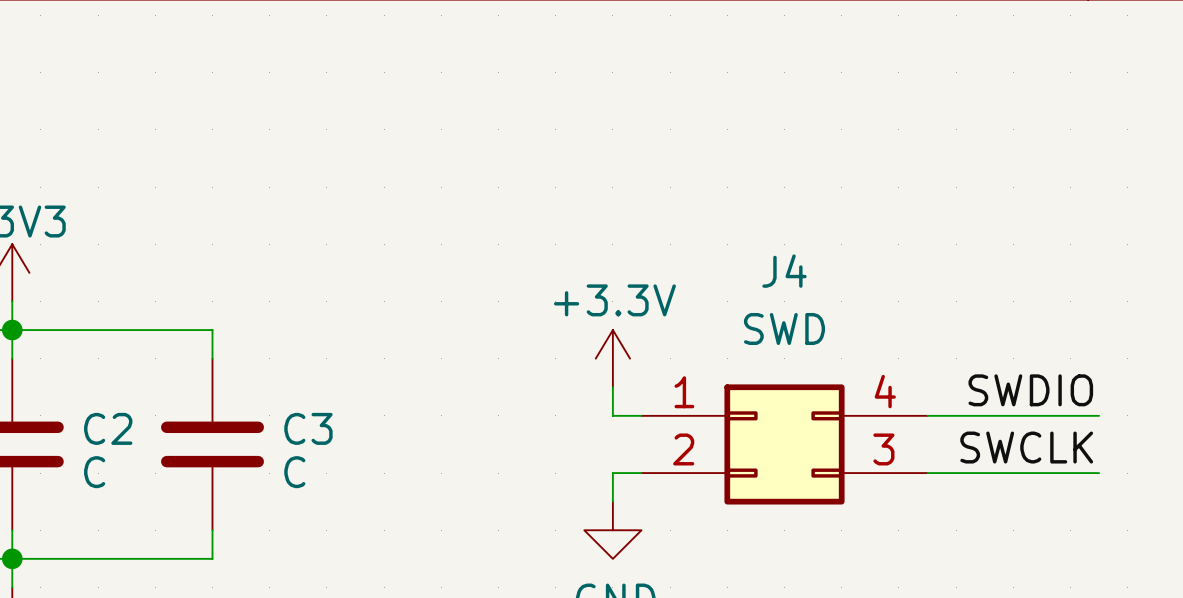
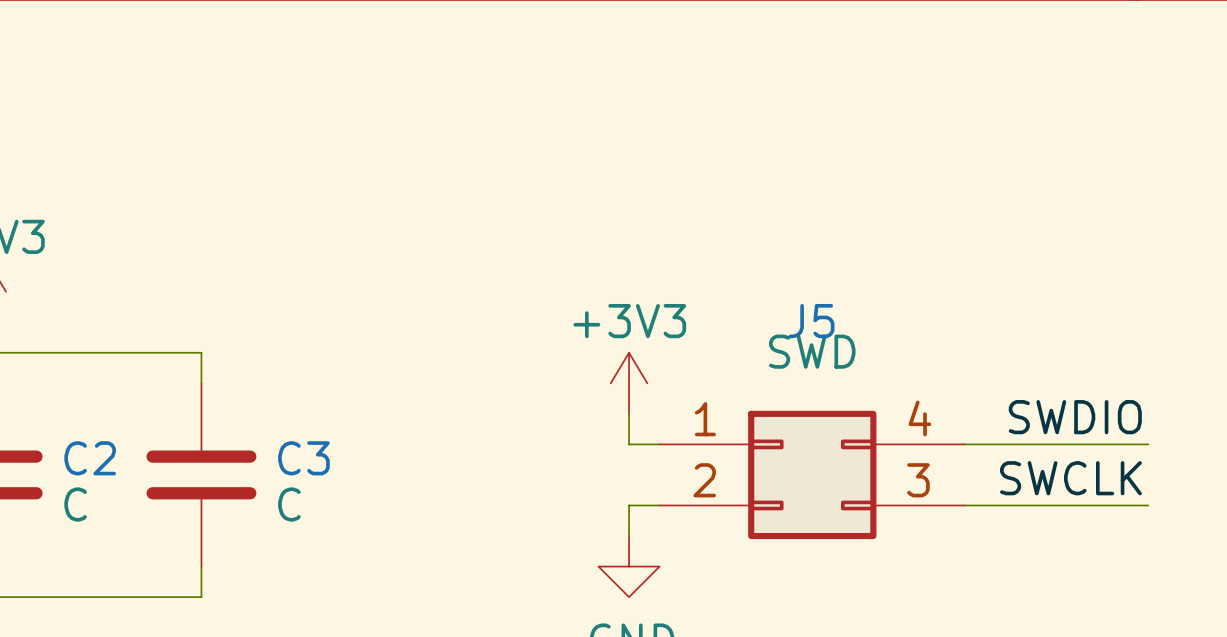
J4 name: J4 (784, 271) -> J5 (811, 321)
power symbol: +3.3V (612, 358) -> +3V3 (629, 383)

